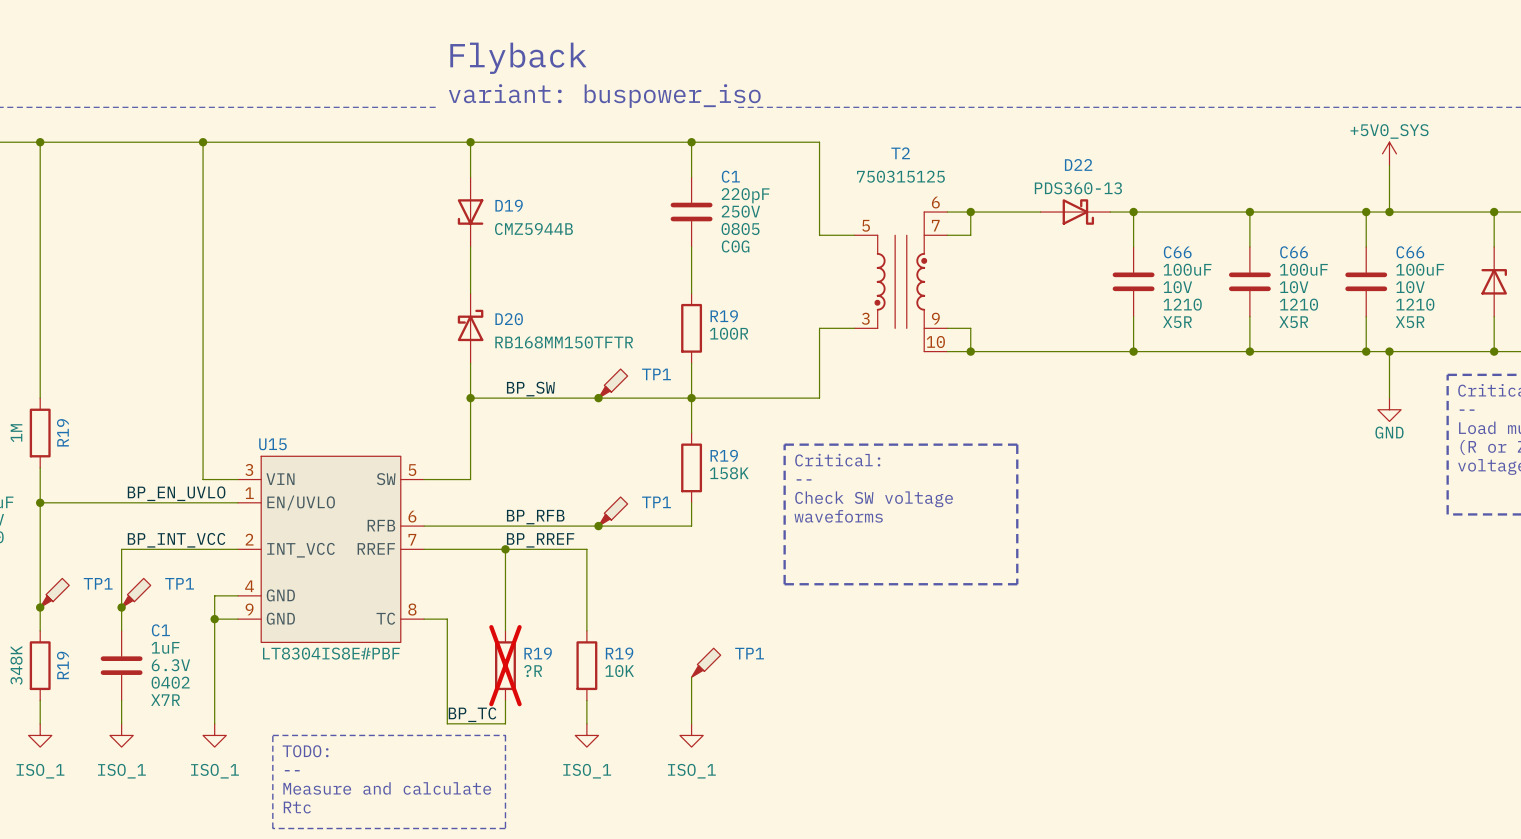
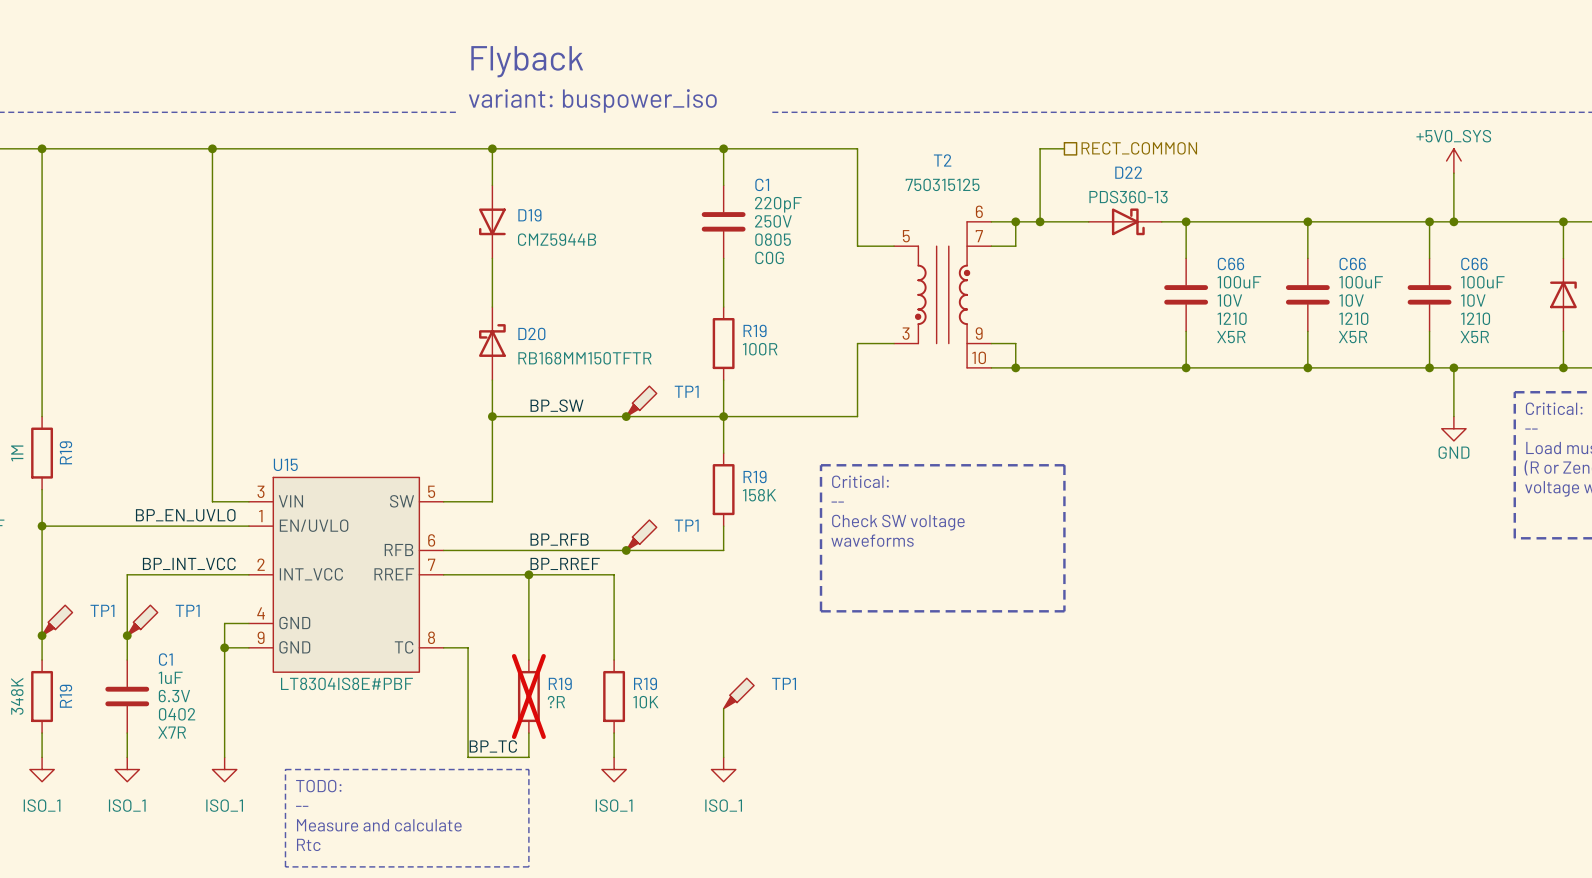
wire: none -> (1064, 148) (1040, 148) (1040, 221)
hierarchical label: none -> RECT_COMMON (1139, 148)
junction: none -> (1040, 221)

